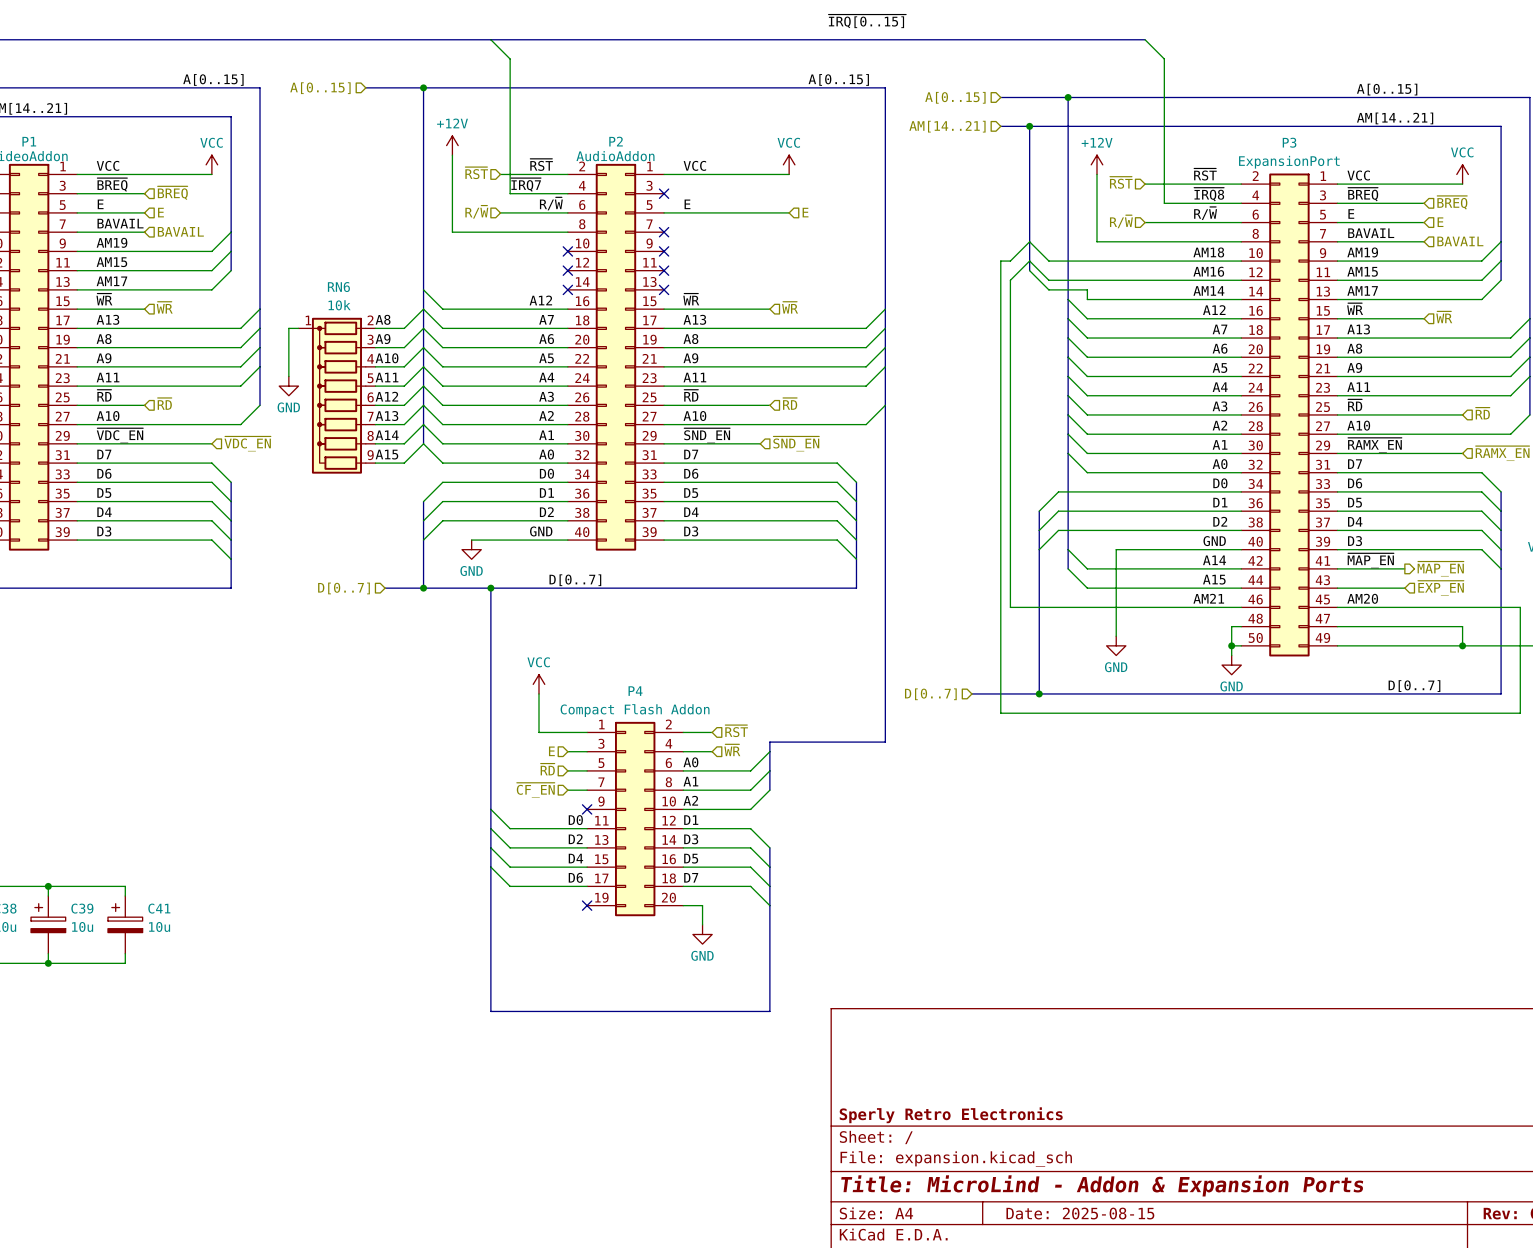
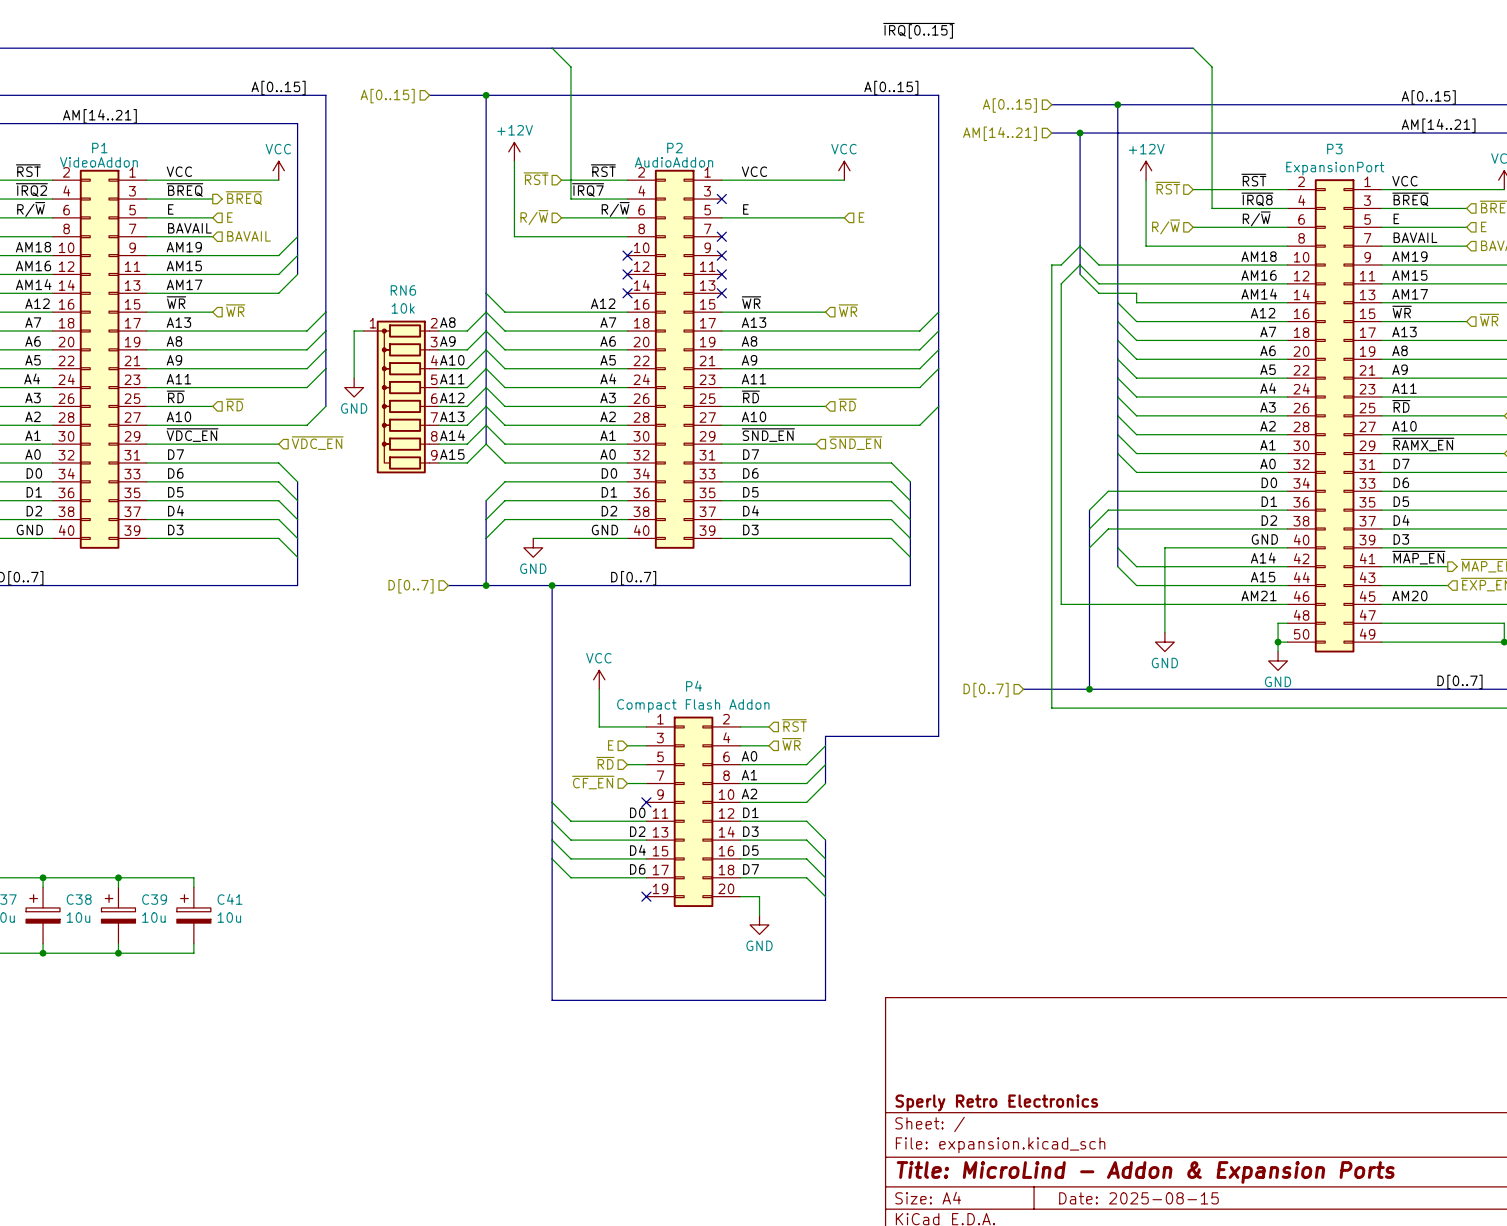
hierarchical label shape: input (172, 193) -> output (244, 198)

